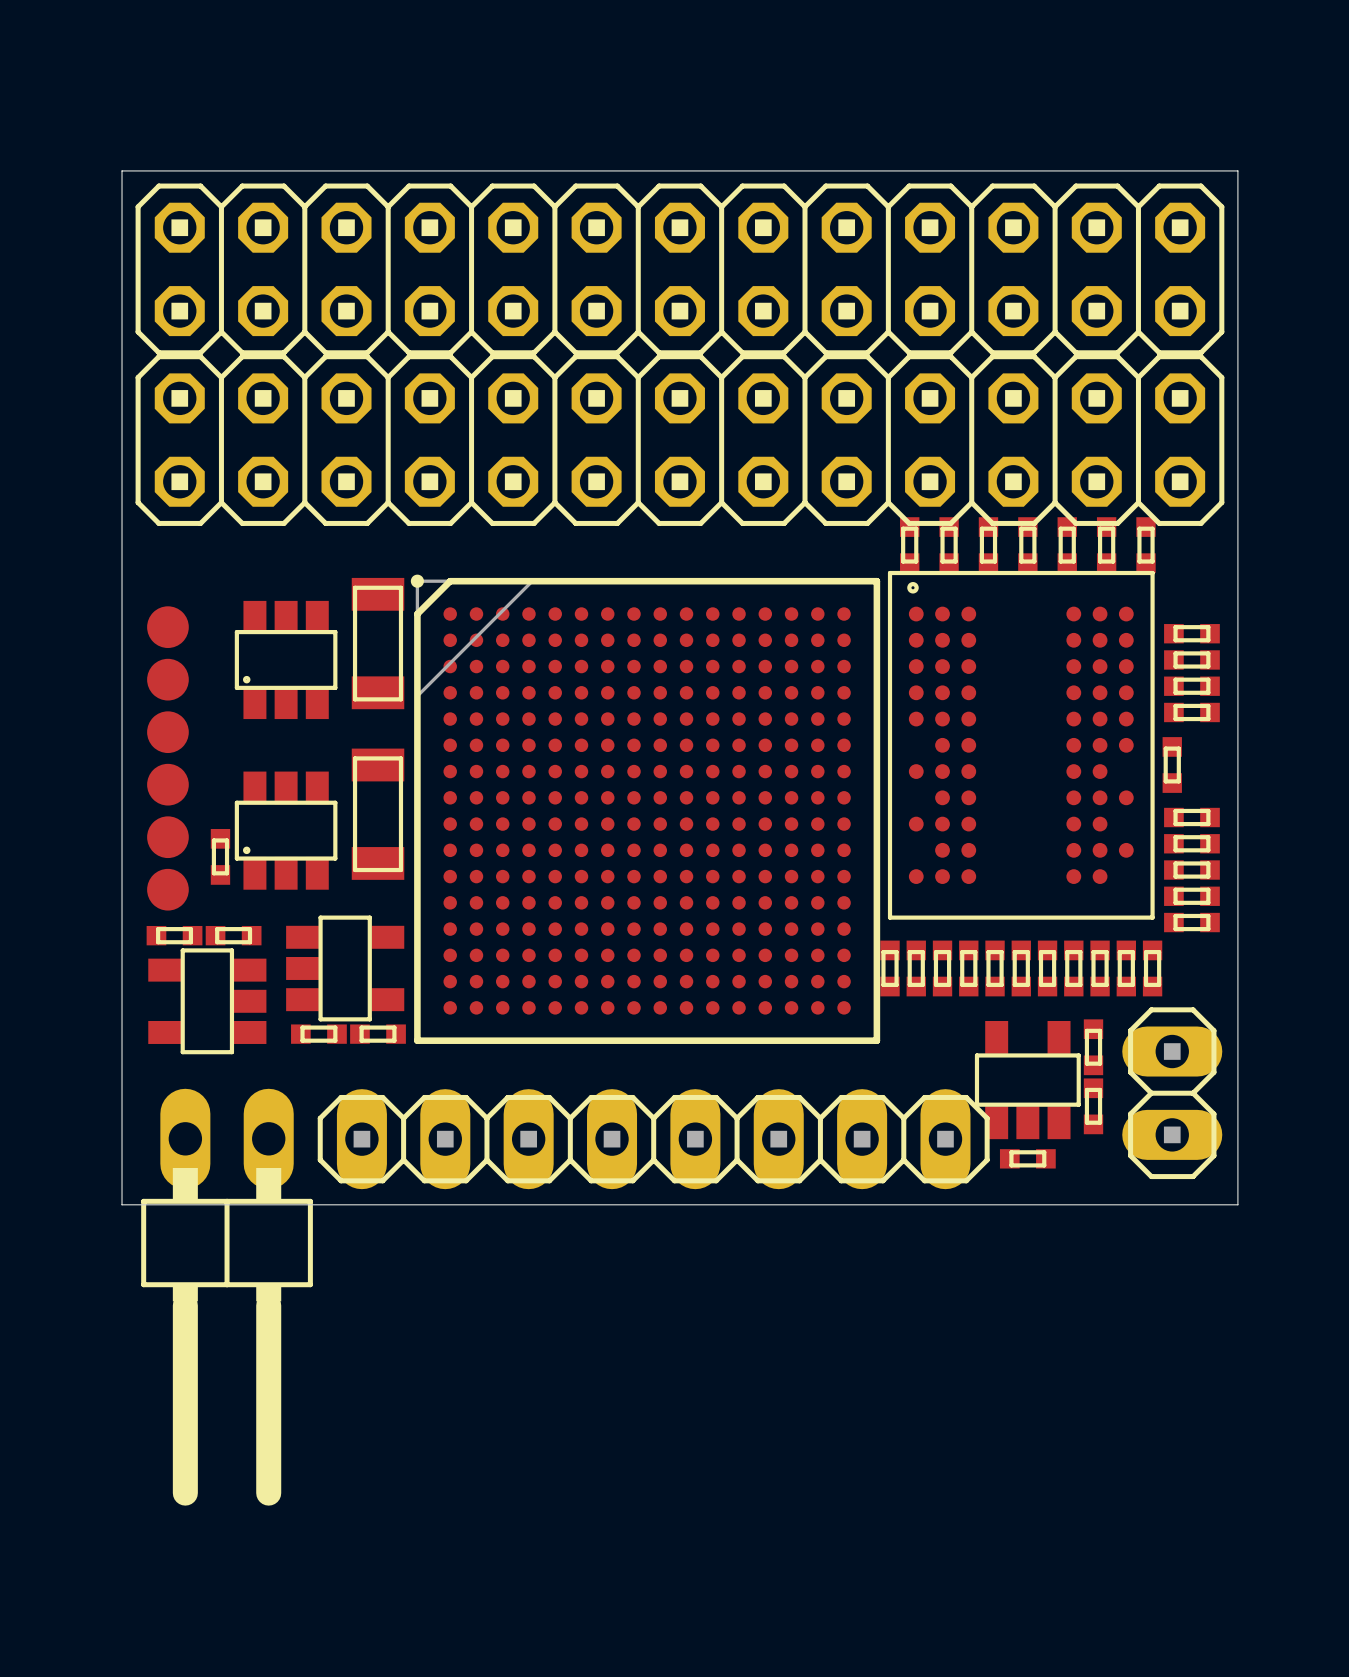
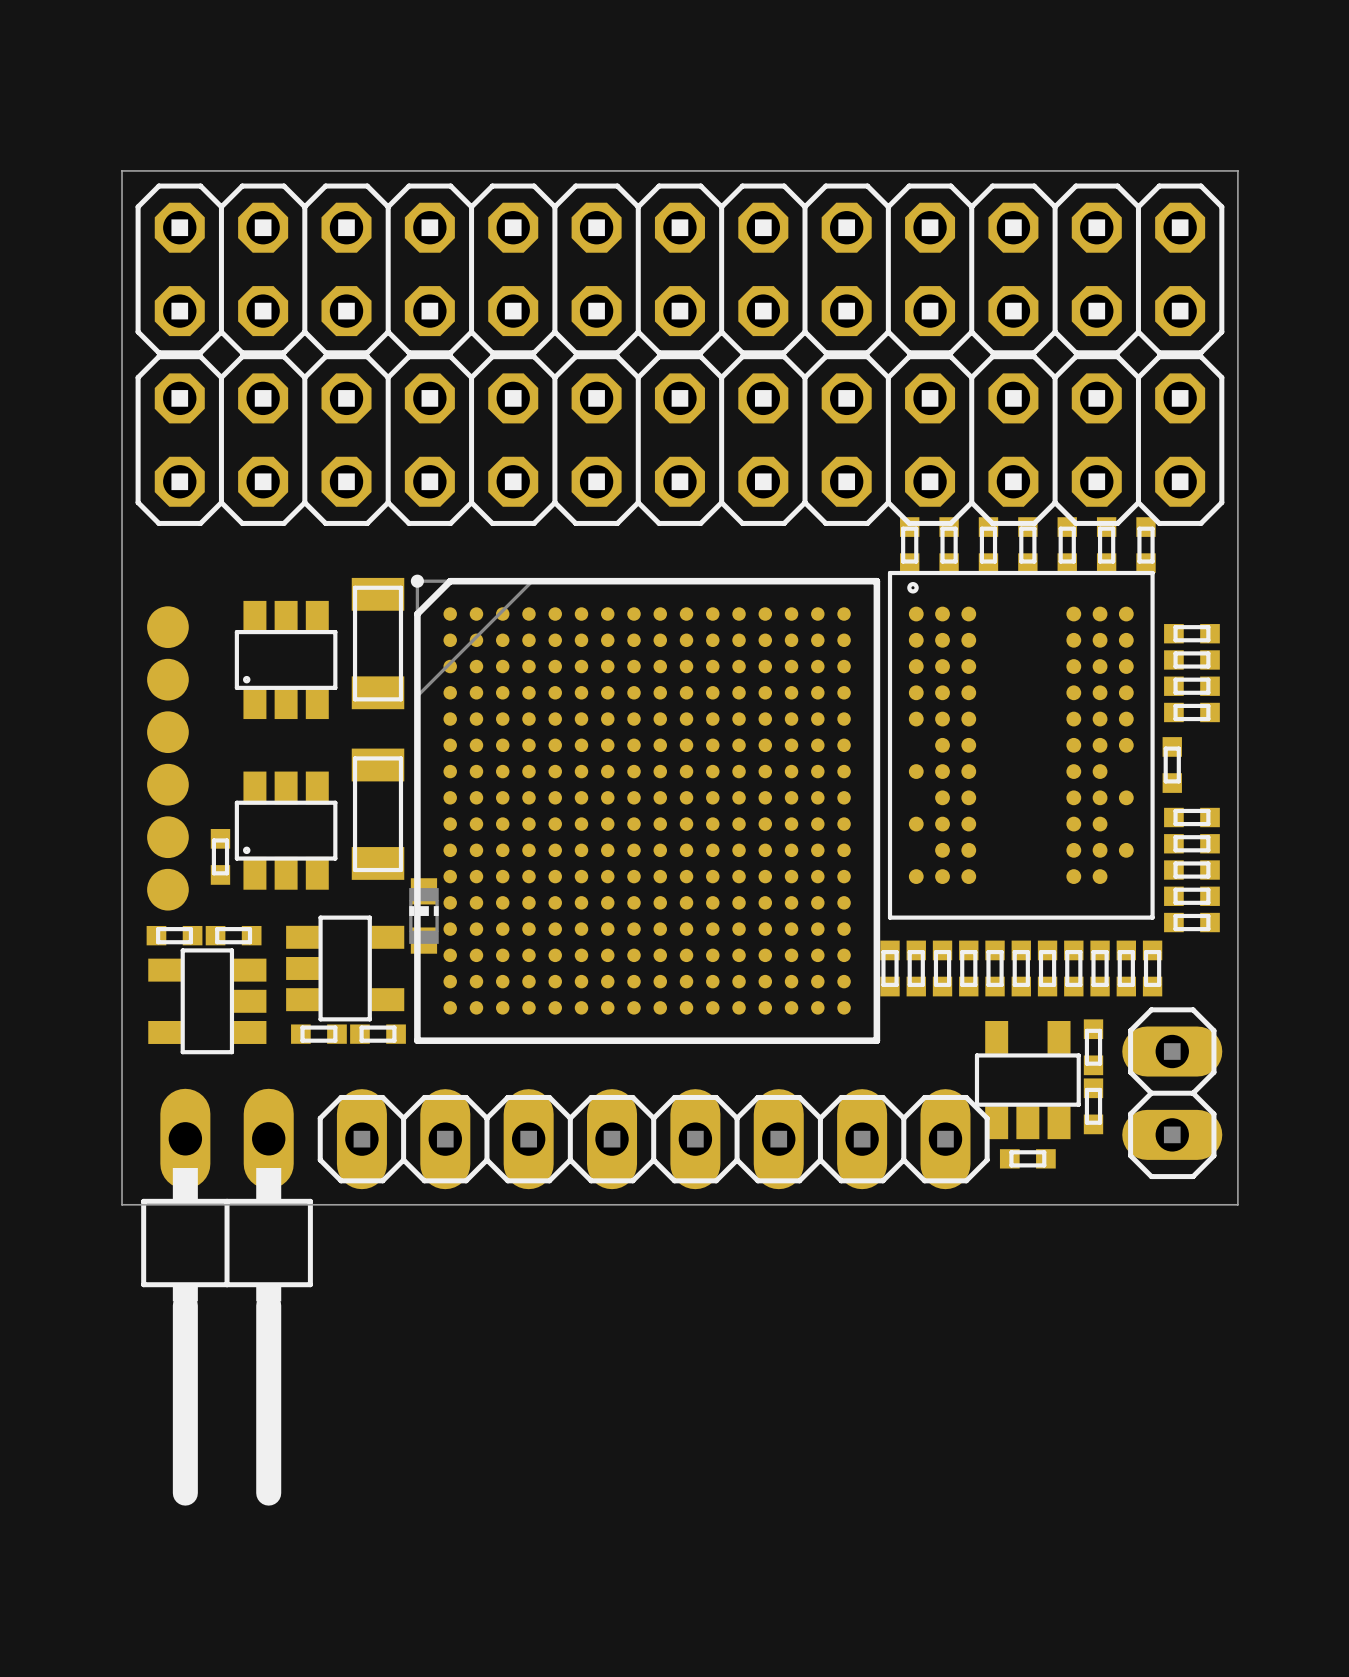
part: none -> (423, 915)

